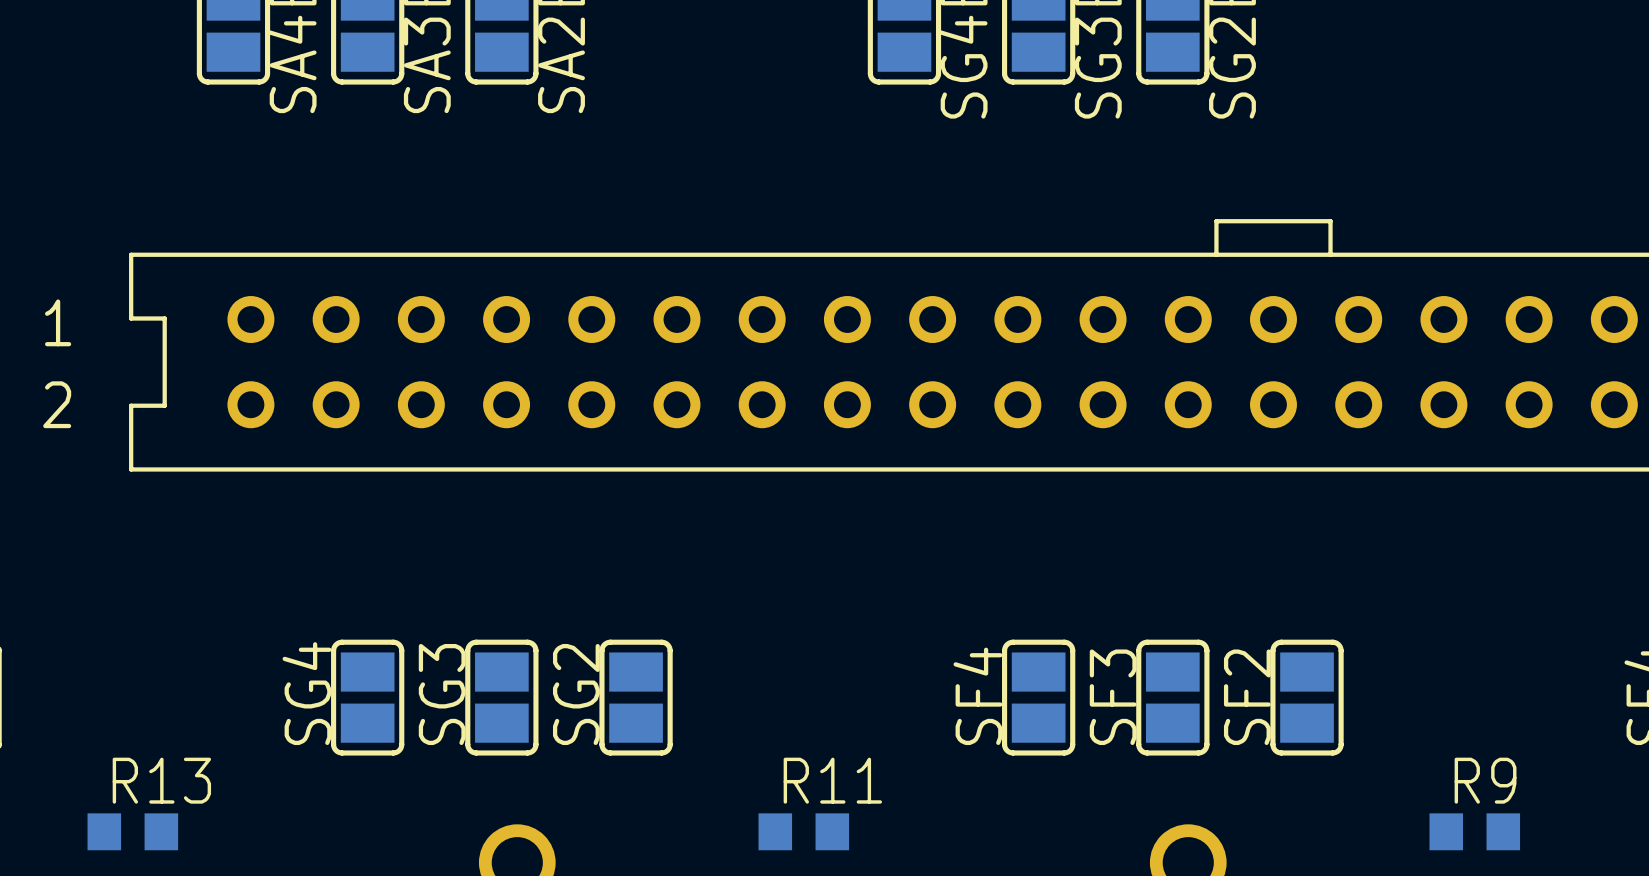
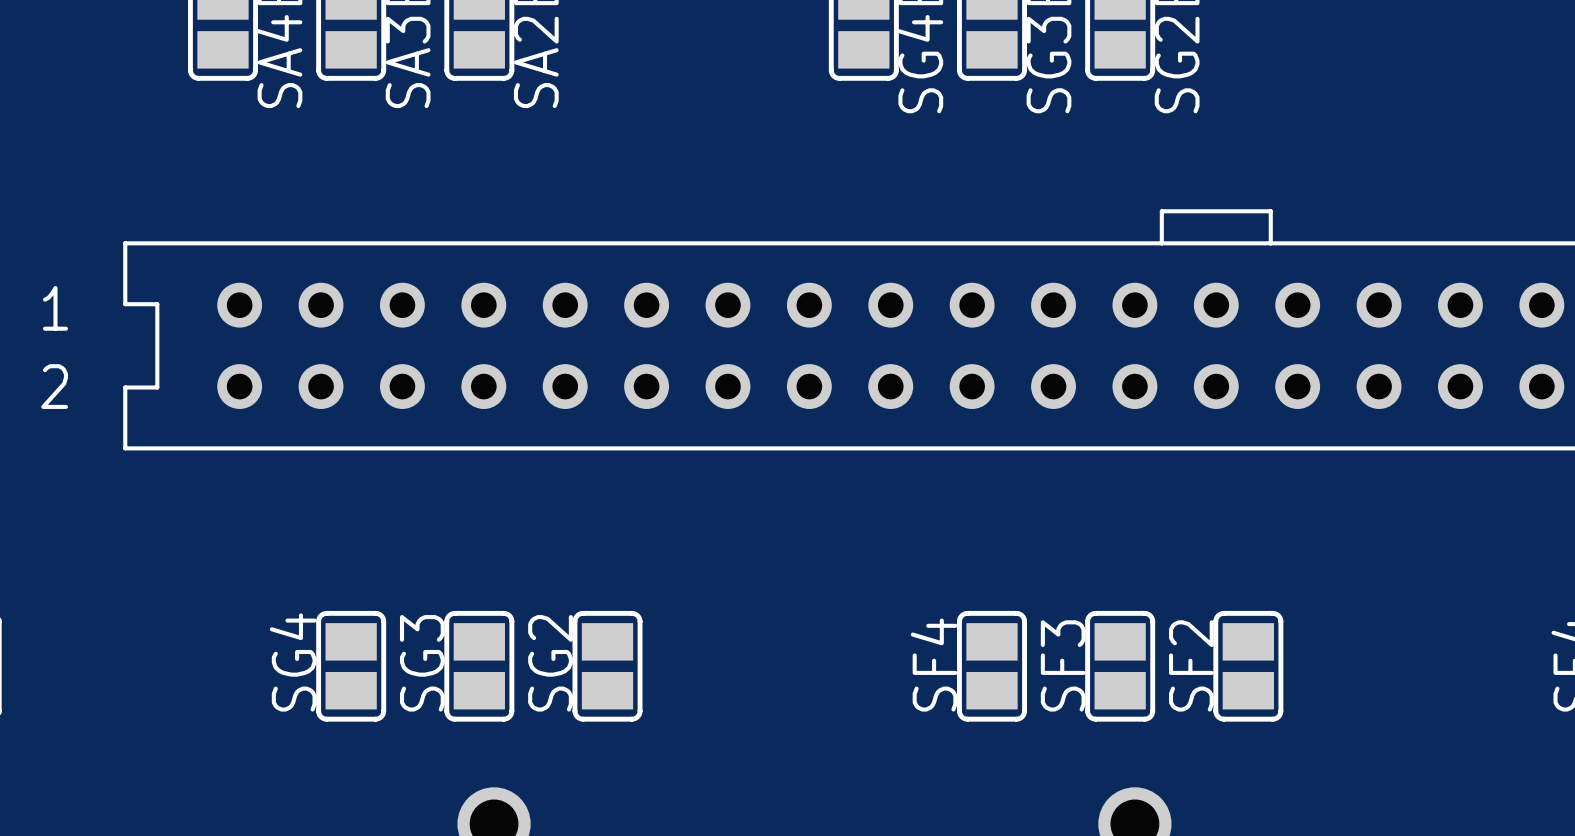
R13: (132, 831) -> none
R11: (803, 831) -> none
R9: (1474, 831) -> none

